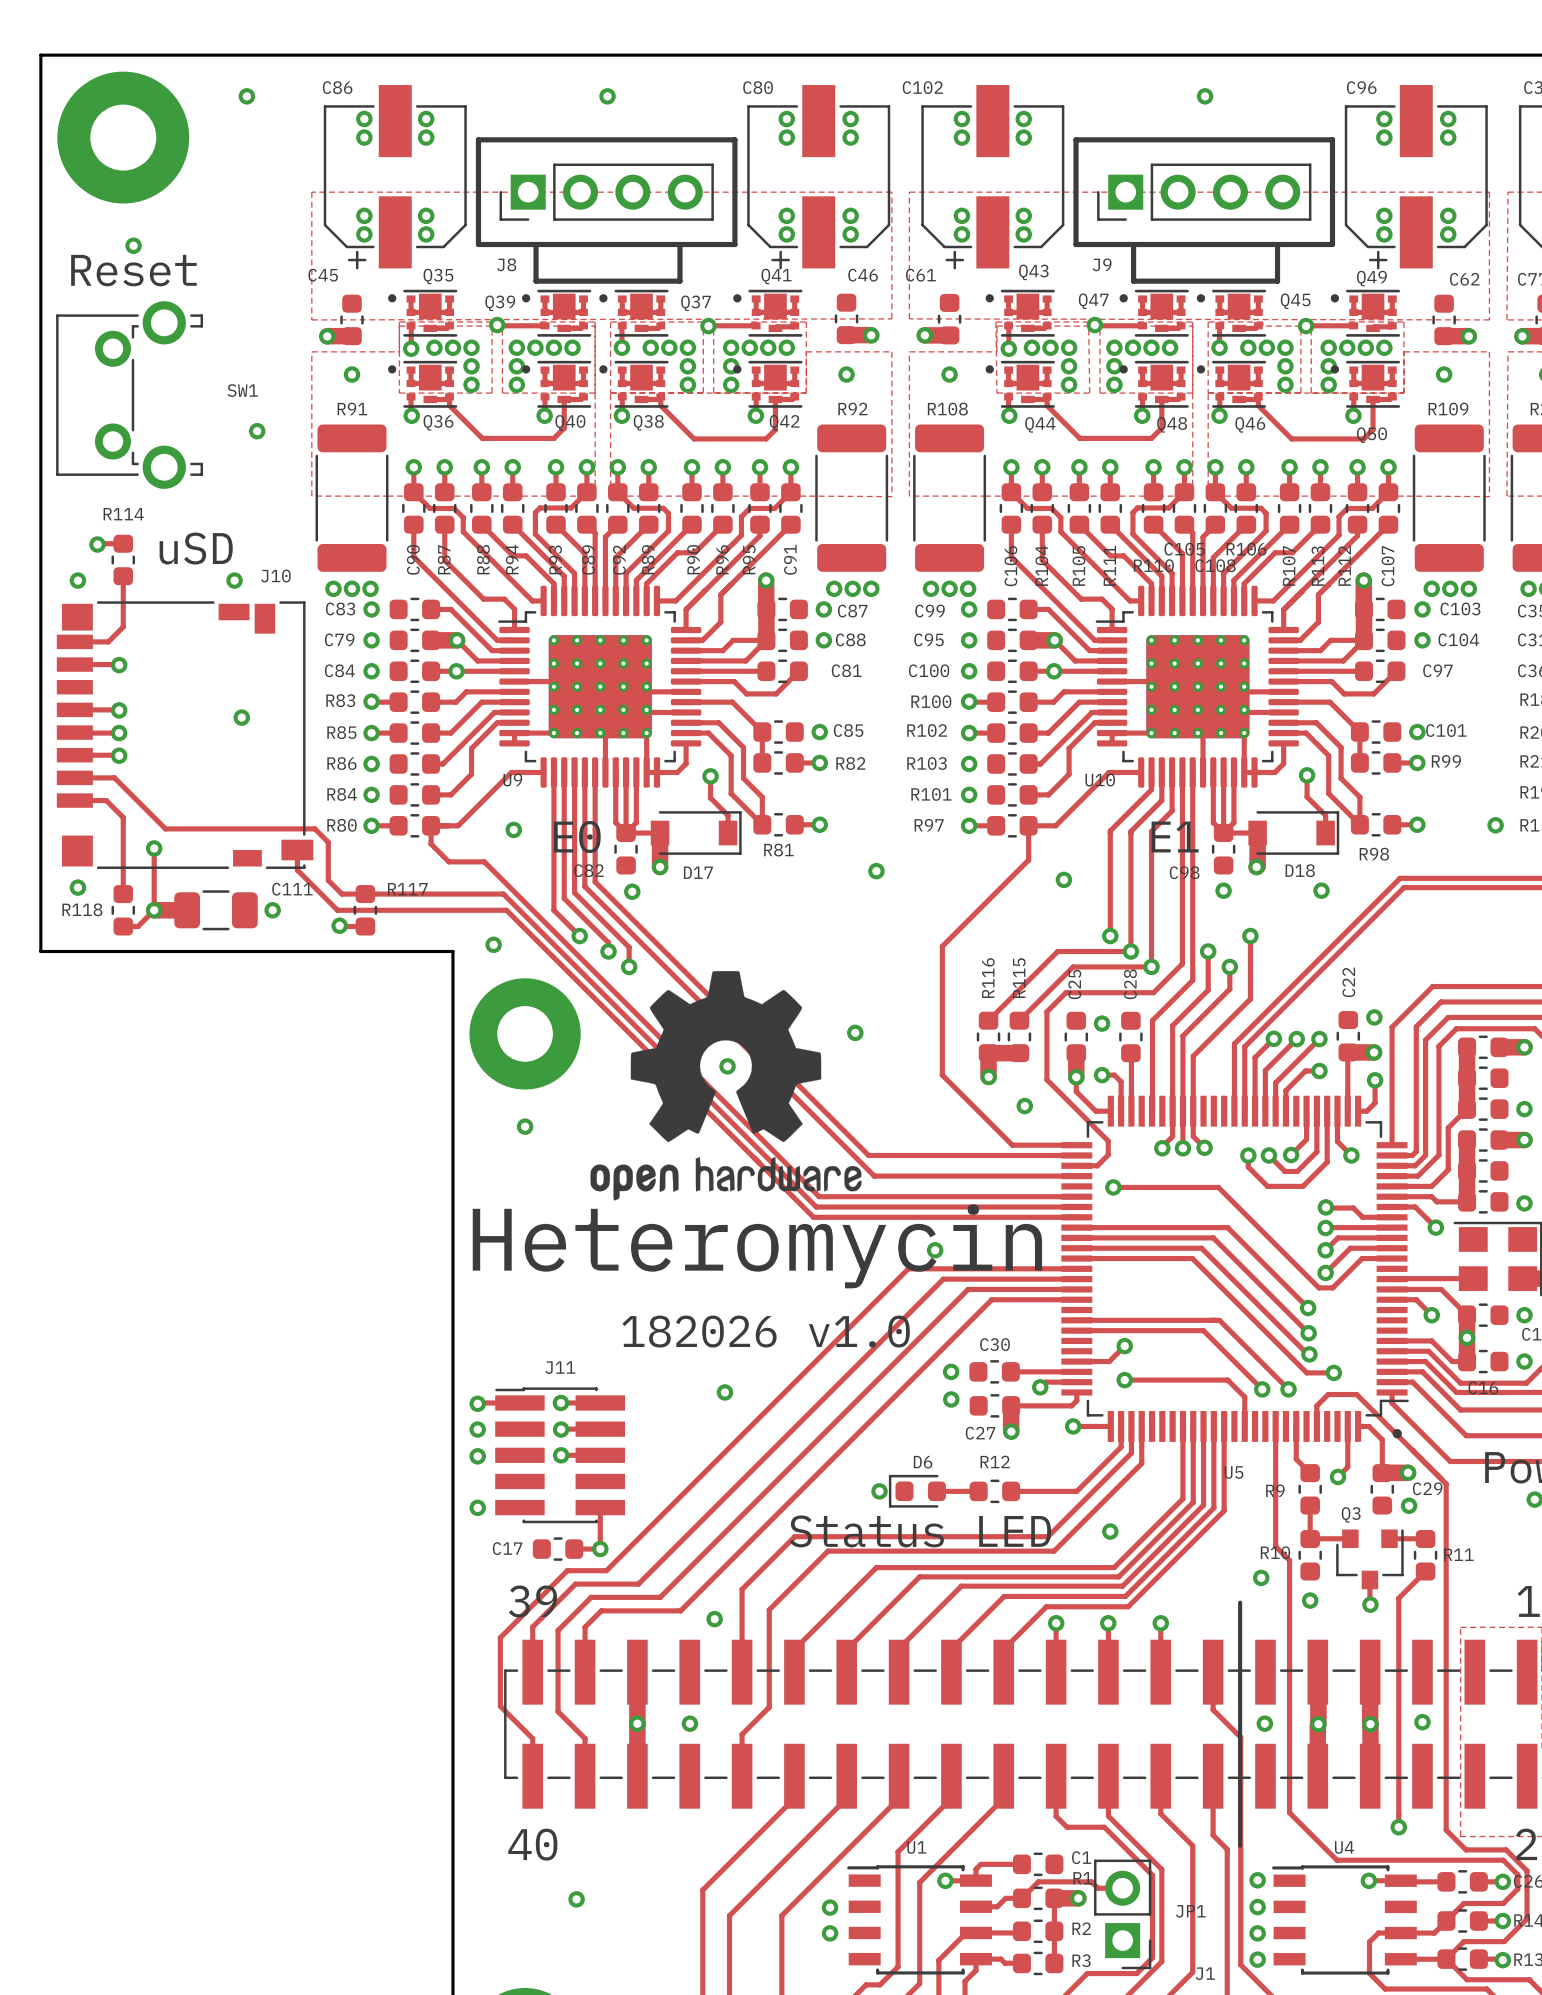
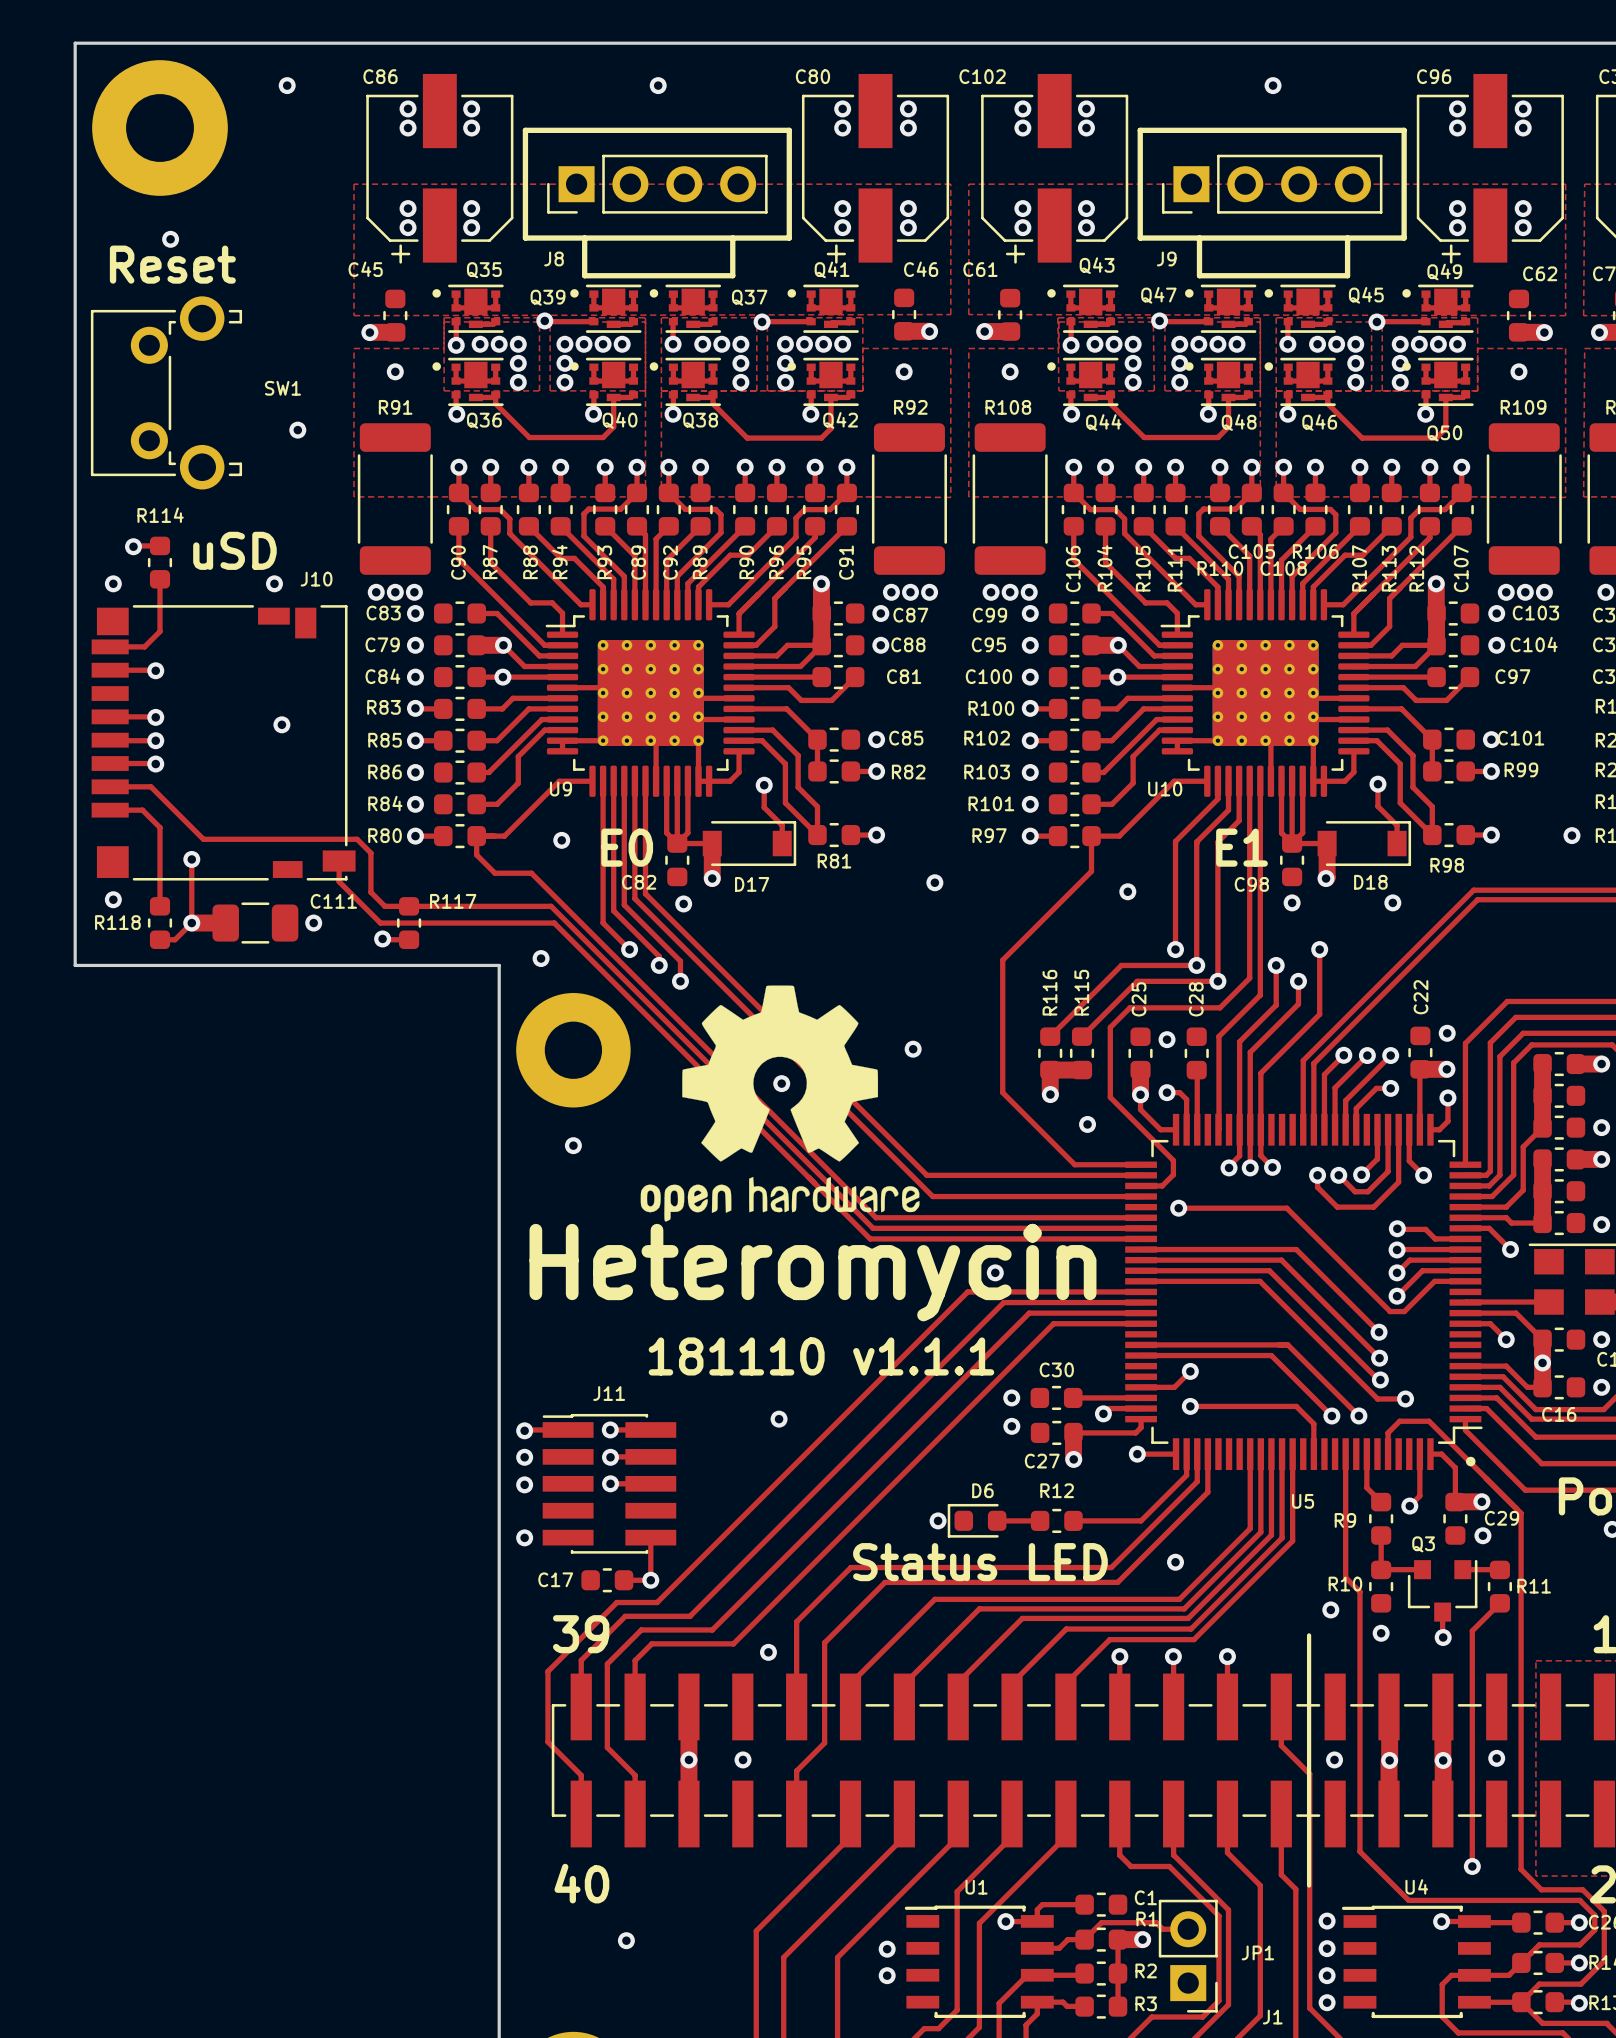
text: 182026 v1.0 (766, 1331) -> 181110 v1.1.1 (821, 1356)

